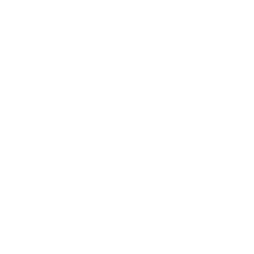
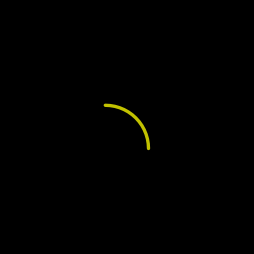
board edge: none -> (105, 105) (119, 107) (135, 117) (144, 129) (148, 148)

